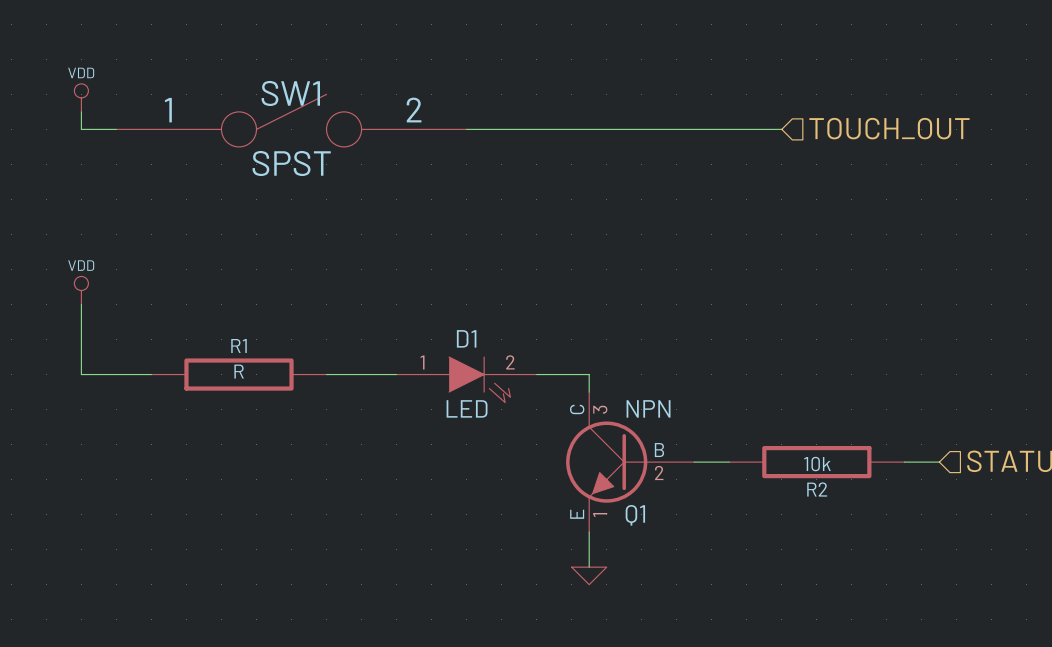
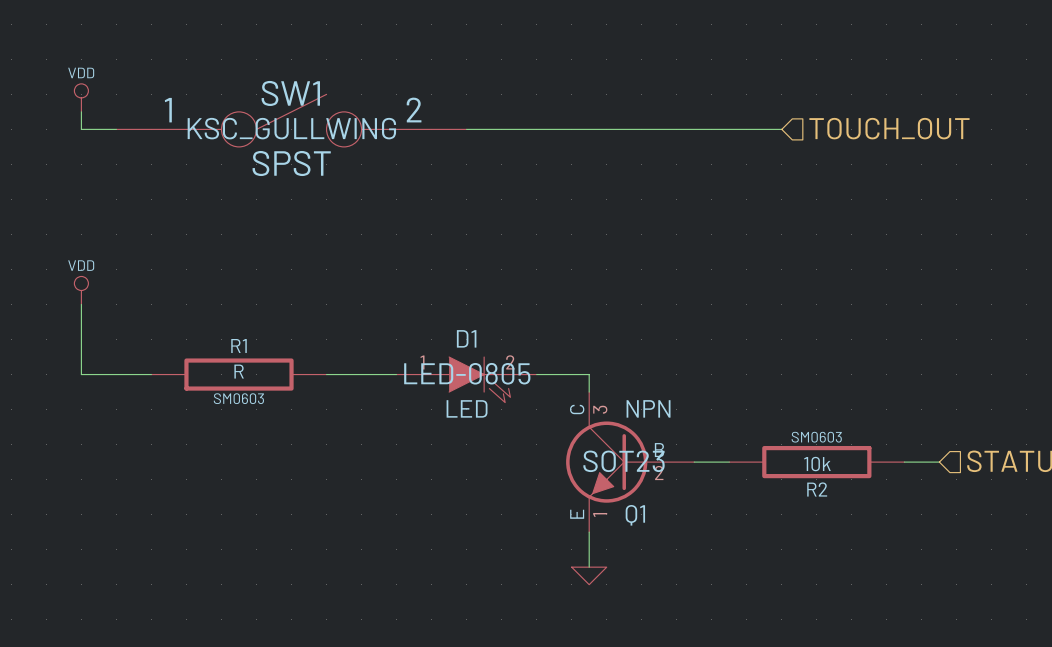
SW1 text: none -> KSC_GULLWING (291, 128)
D1 text: none -> LED-0805 (467, 373)
R1 text: none -> SM0603 (238, 398)
R2 text: none -> SM0603 (816, 437)
Q1 text: none -> SOT23 (624, 461)

